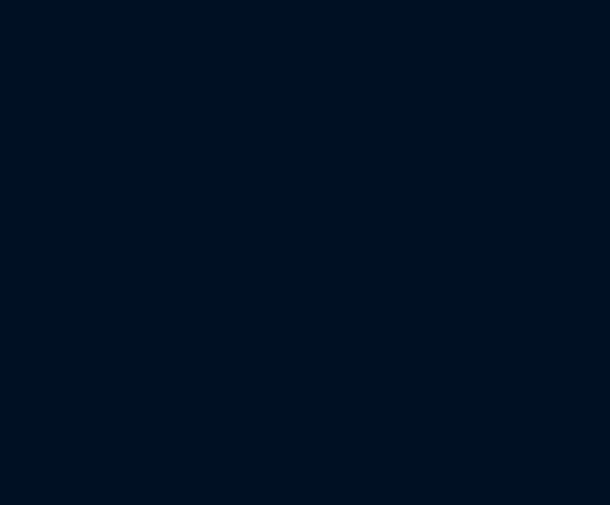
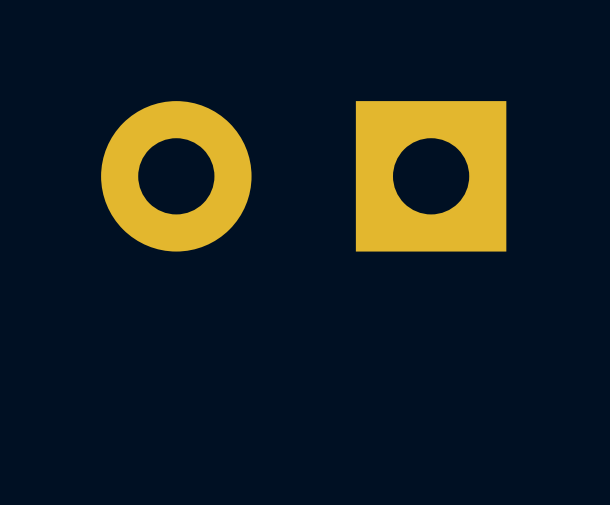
part: none -> (303, 176)

